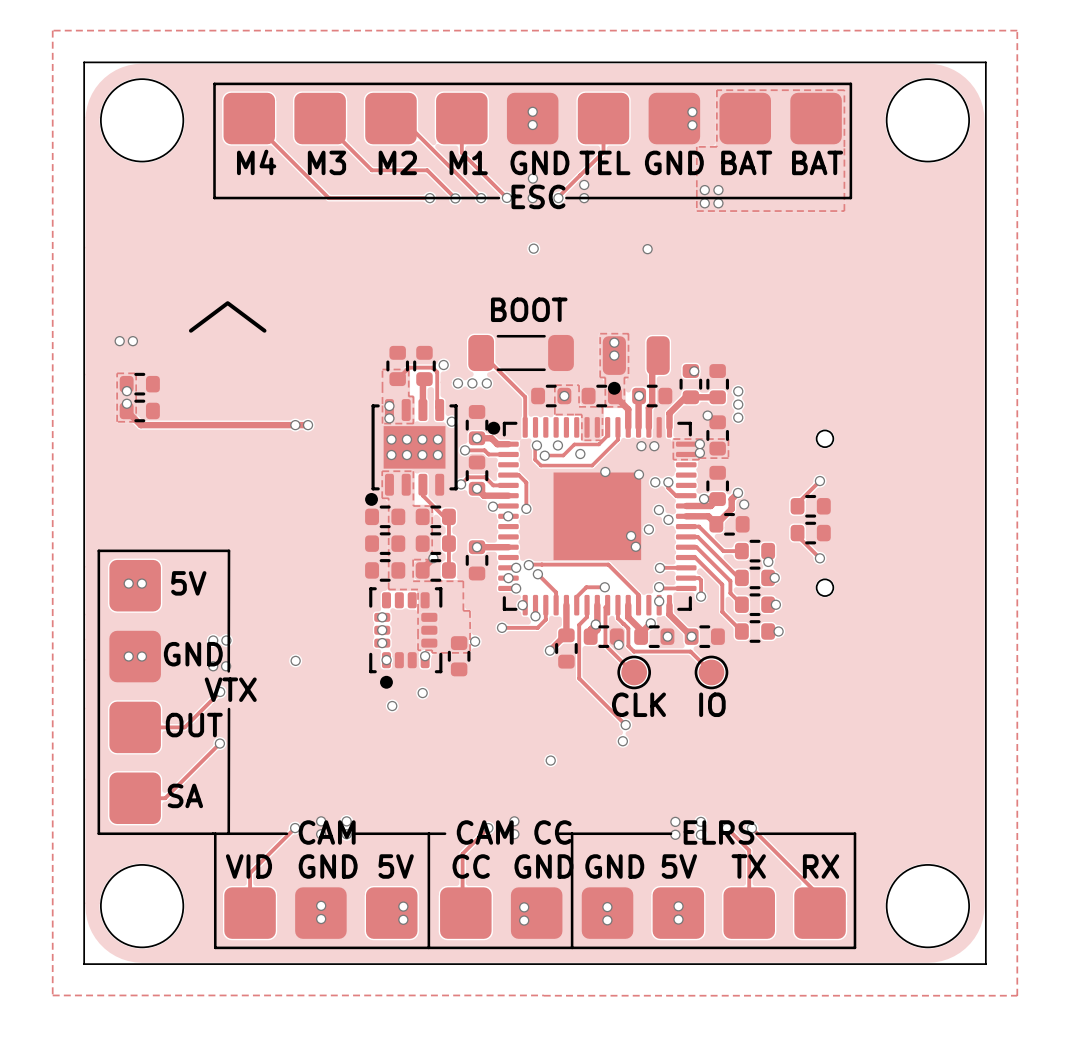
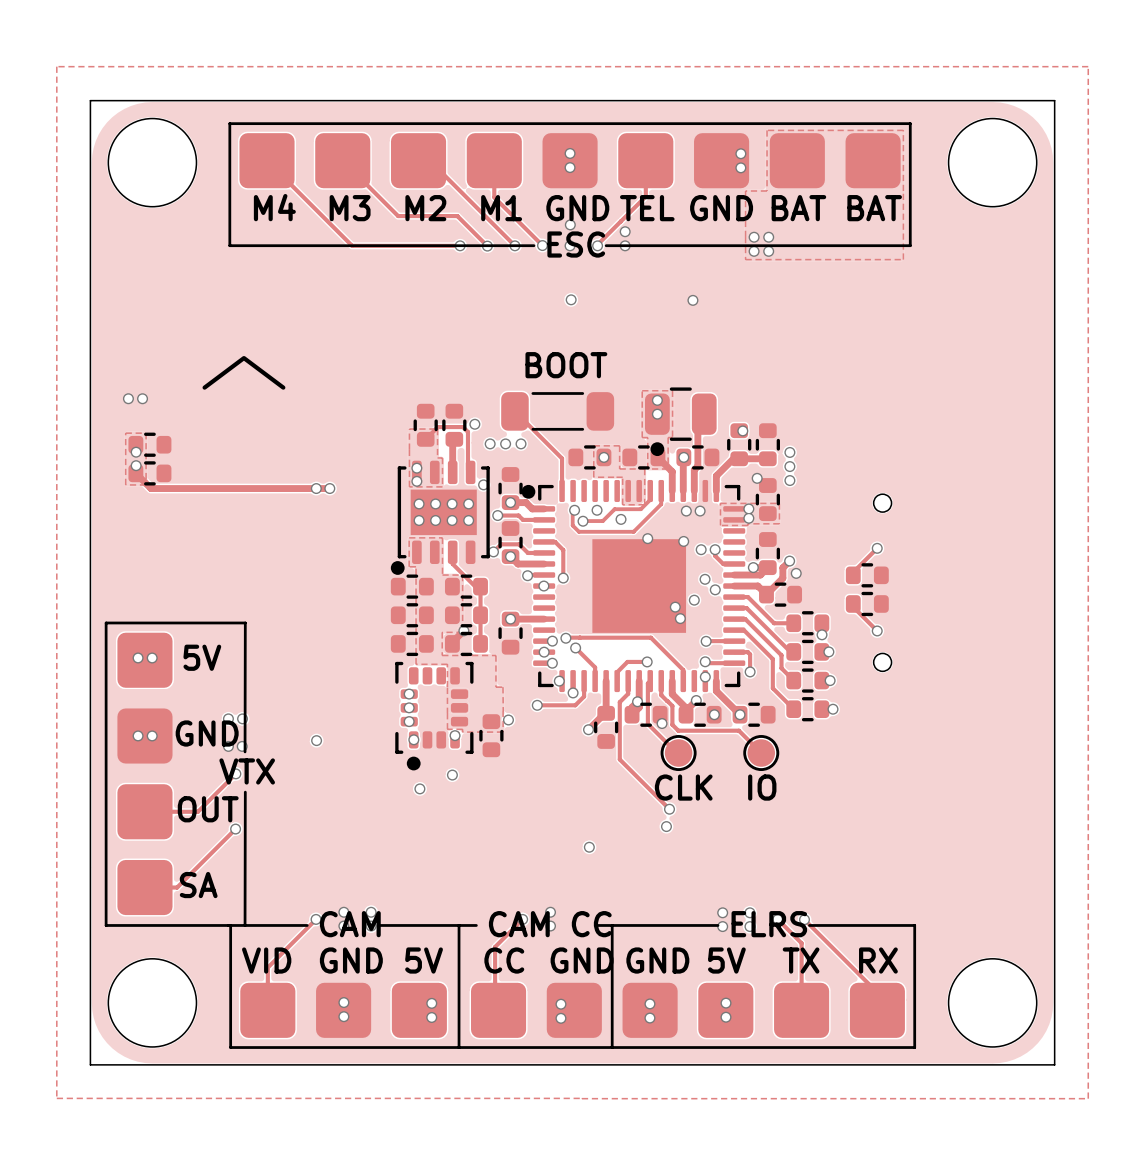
part footprint: [602, 336, 670, 395] -> [644, 387, 717, 457]

